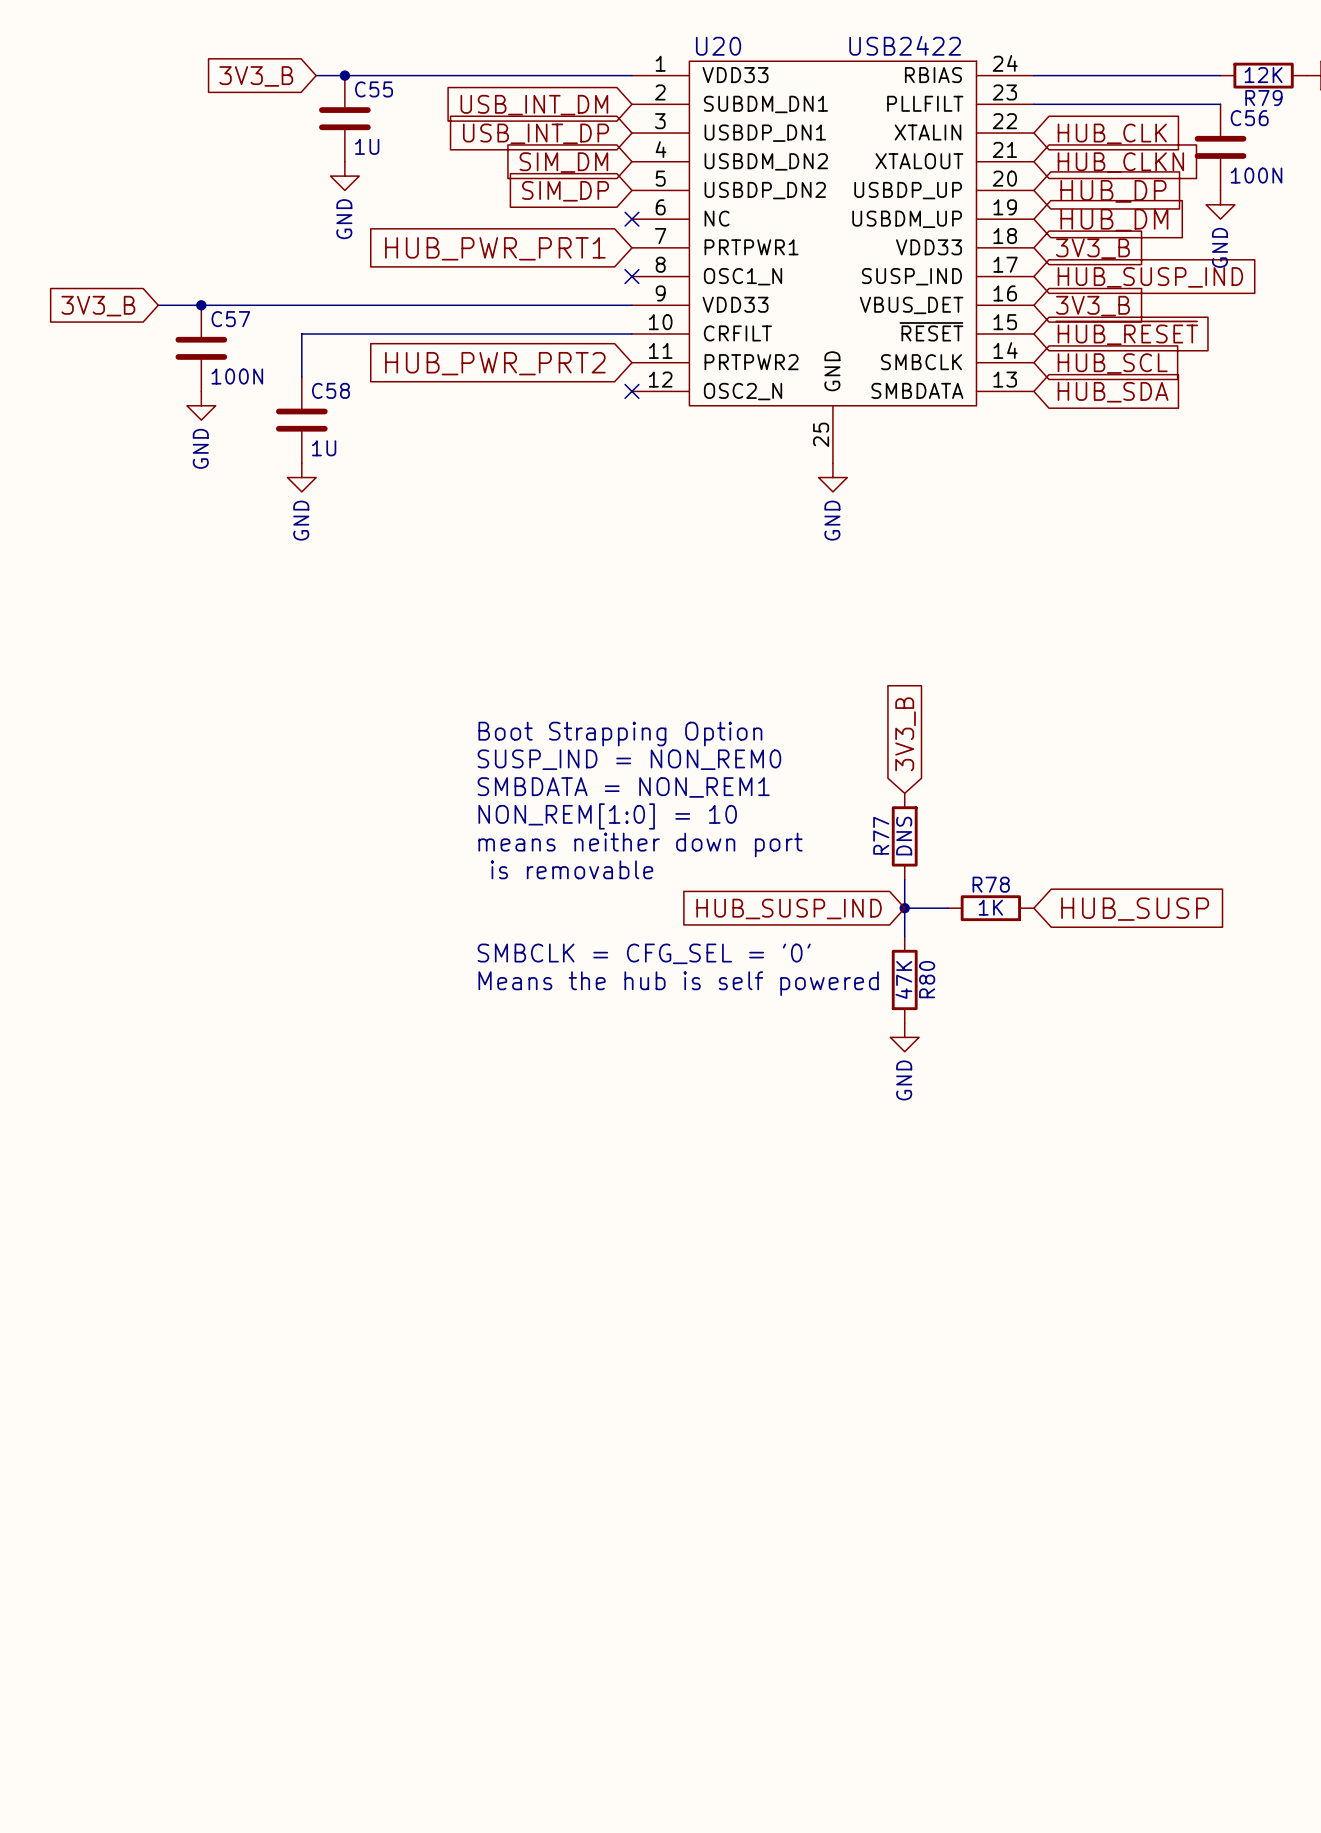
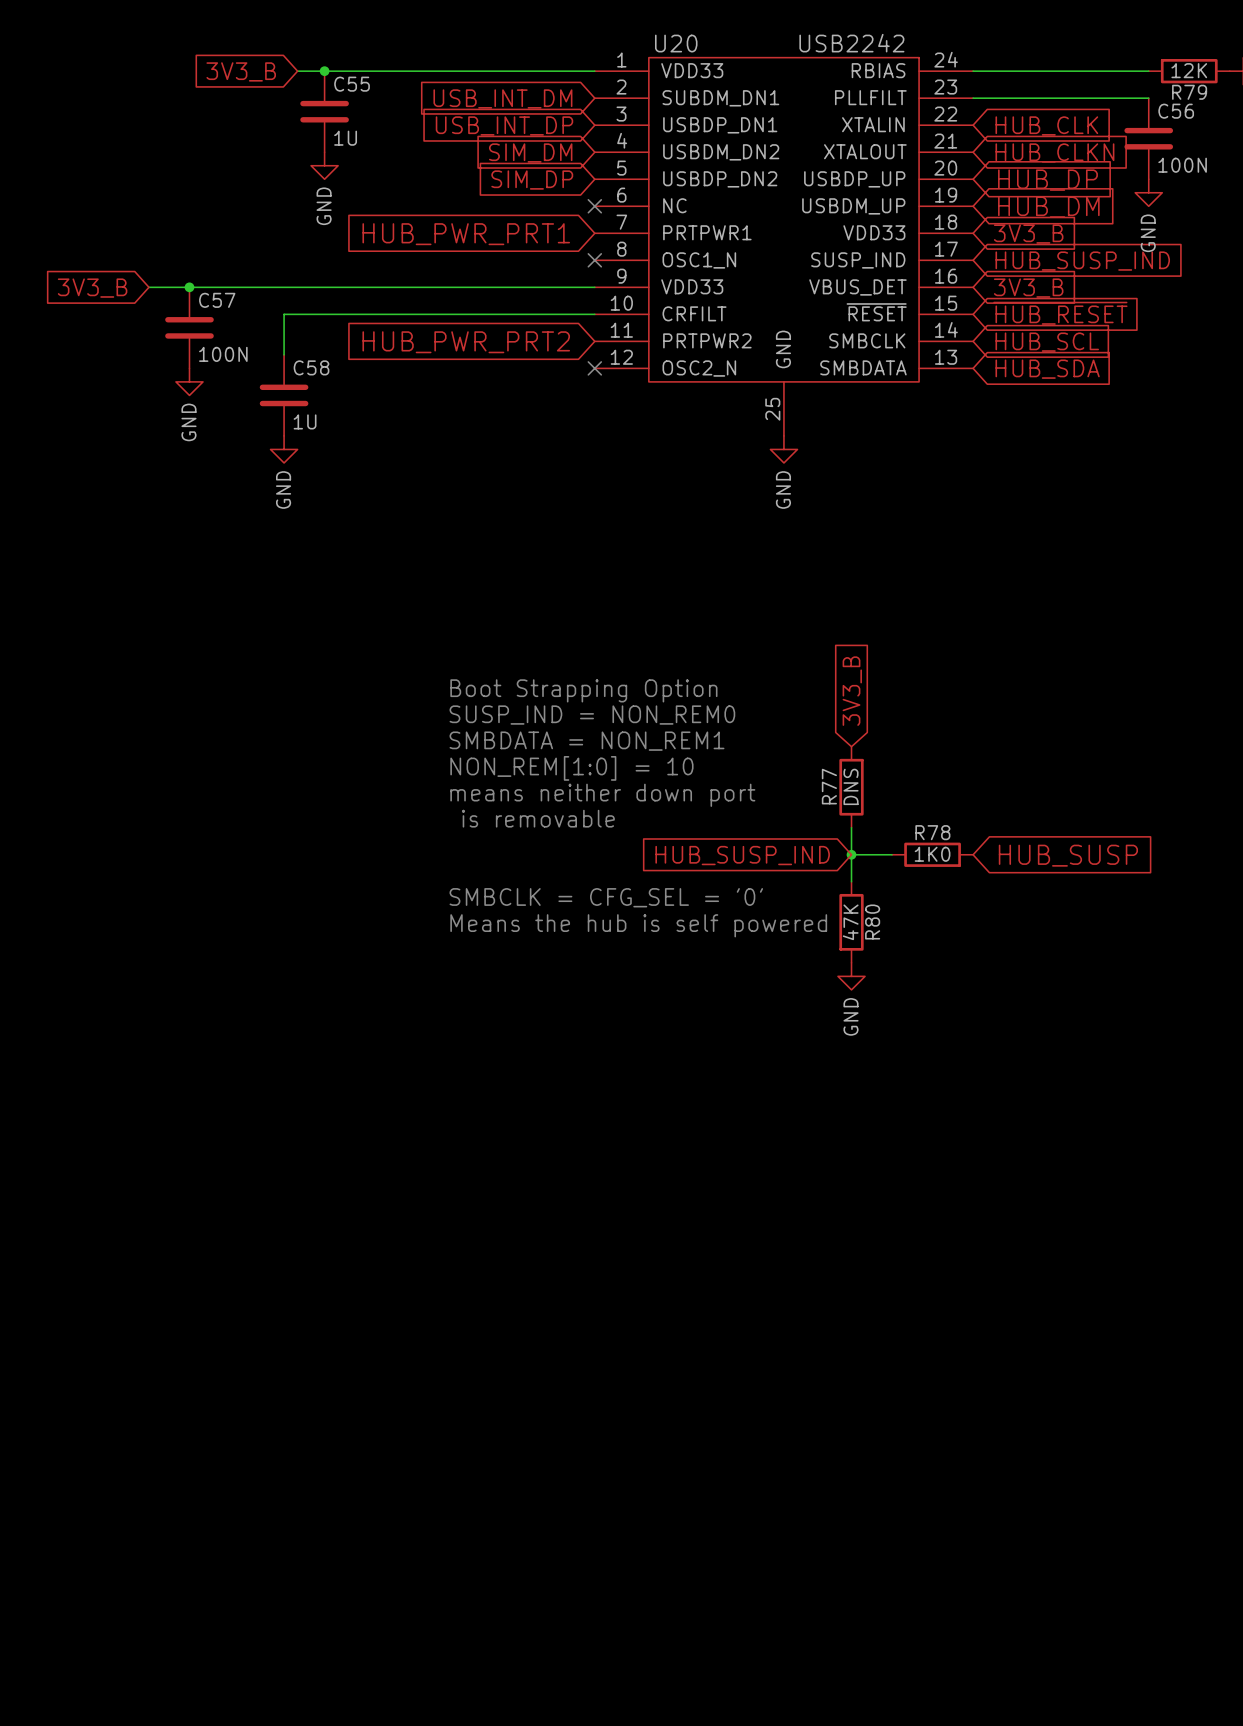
U20 value: USB2422 (905, 45) -> USB2242 (851, 43)
R78 value: 1K (990, 907) -> 1K0 (932, 854)

